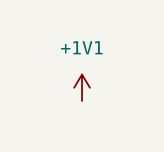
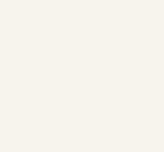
power symbol: +1V1 (82, 87) -> none

